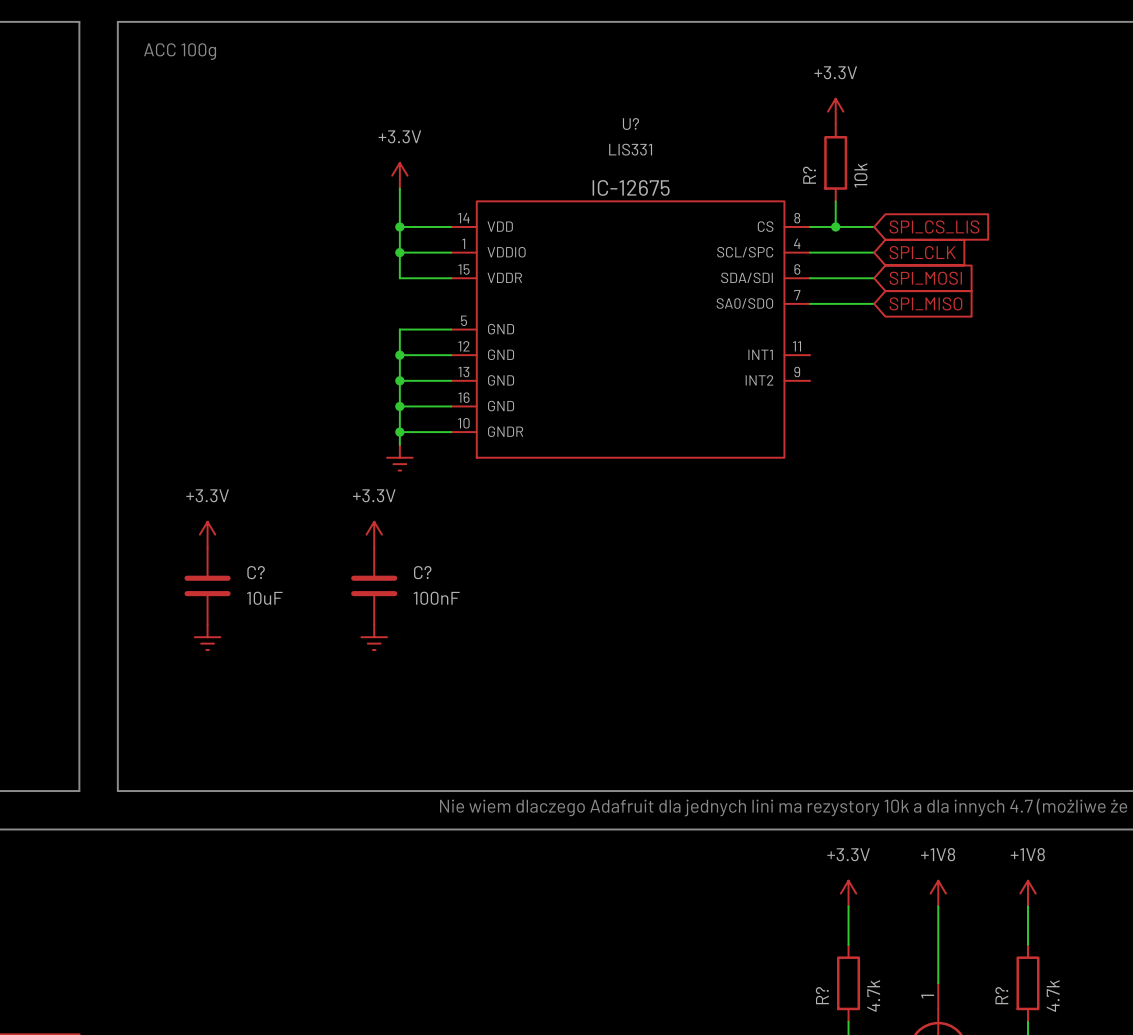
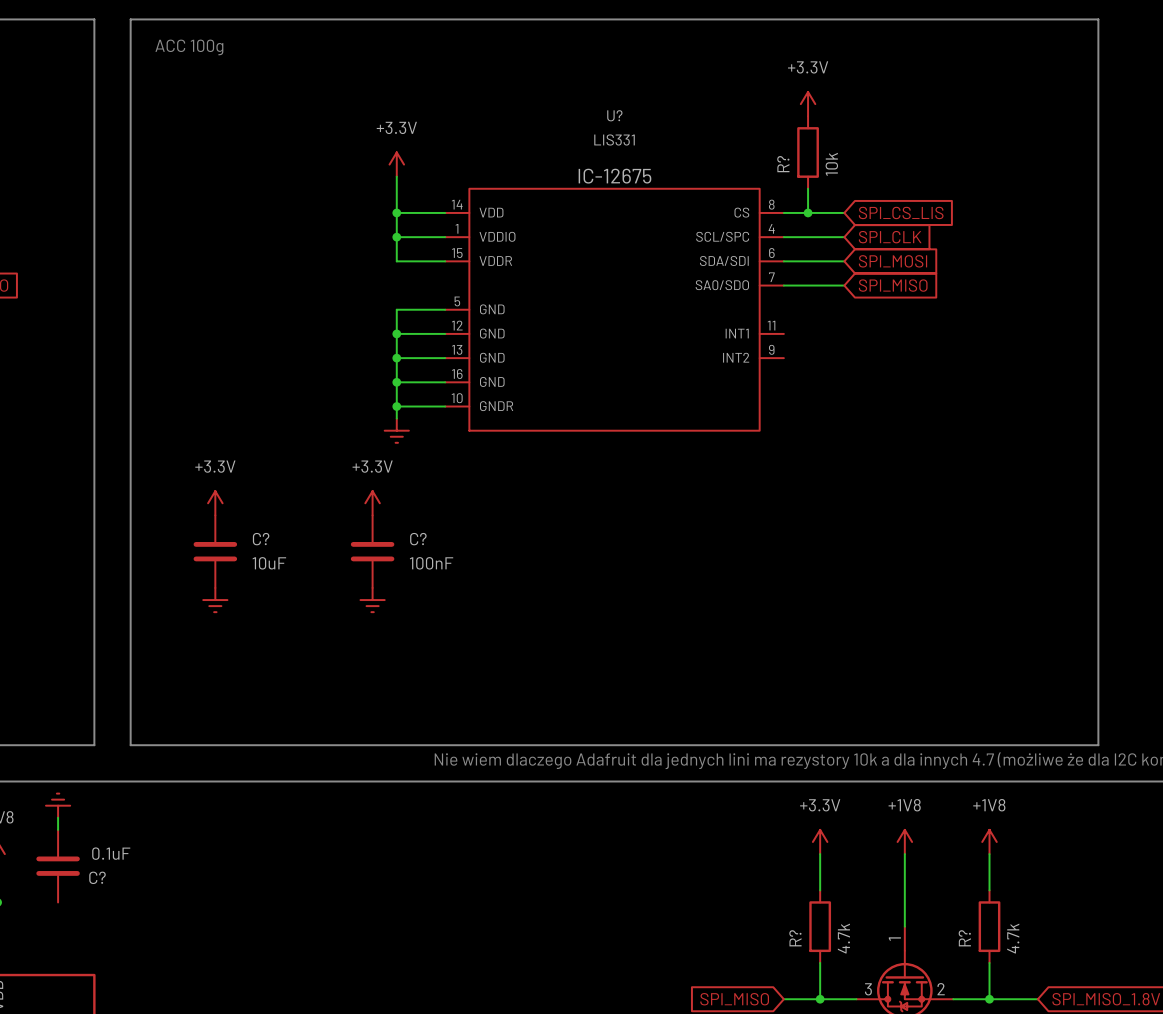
power symbol: none -> (58, 805)
wire: none -> (58, 817) (58, 829)
C?: none -> 0.1uF (58, 866)

